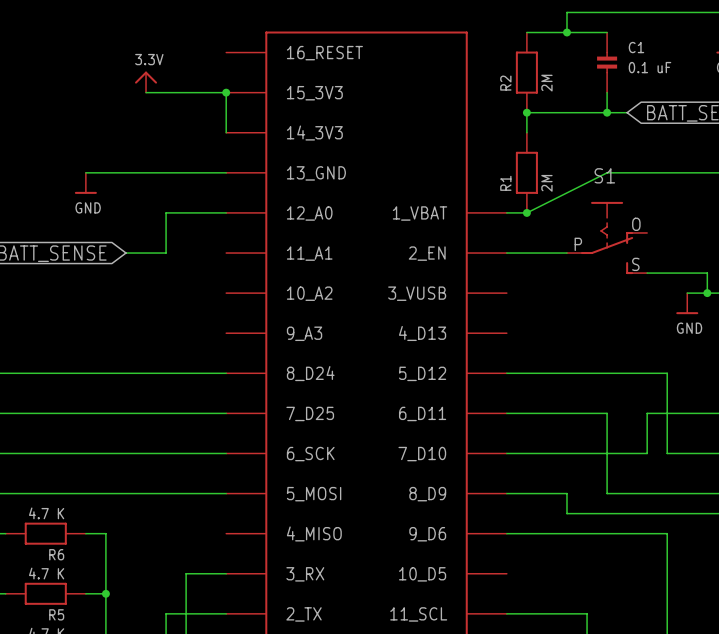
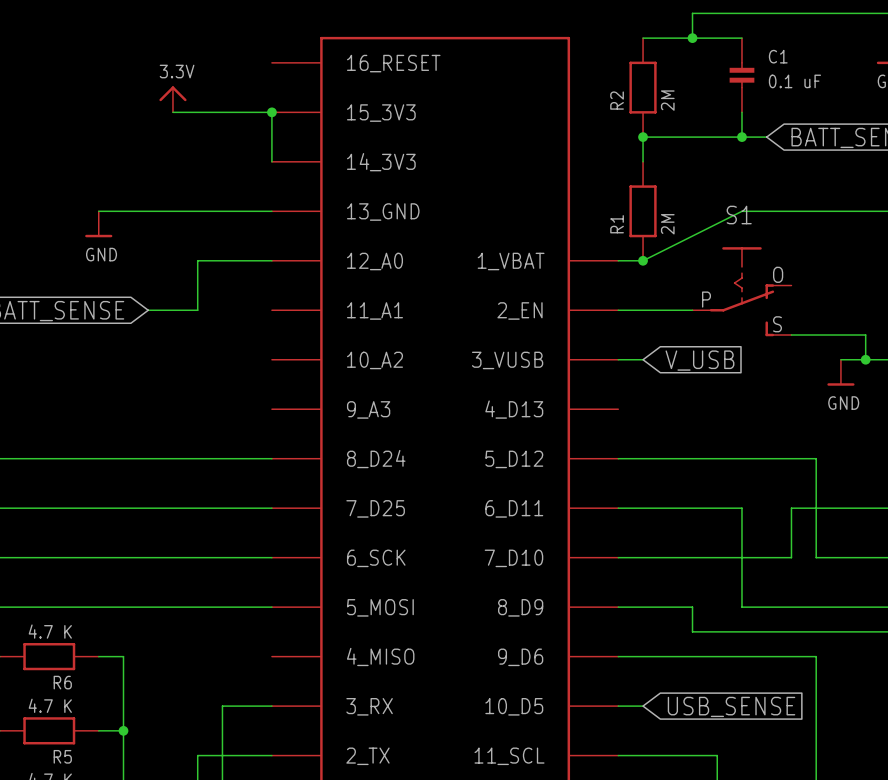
wire: none -> (618, 359) (643, 359)
global label: none -> V_USB (699, 360)
wire: none -> (618, 706) (643, 706)
global label: none -> USB_SENSE (731, 706)

